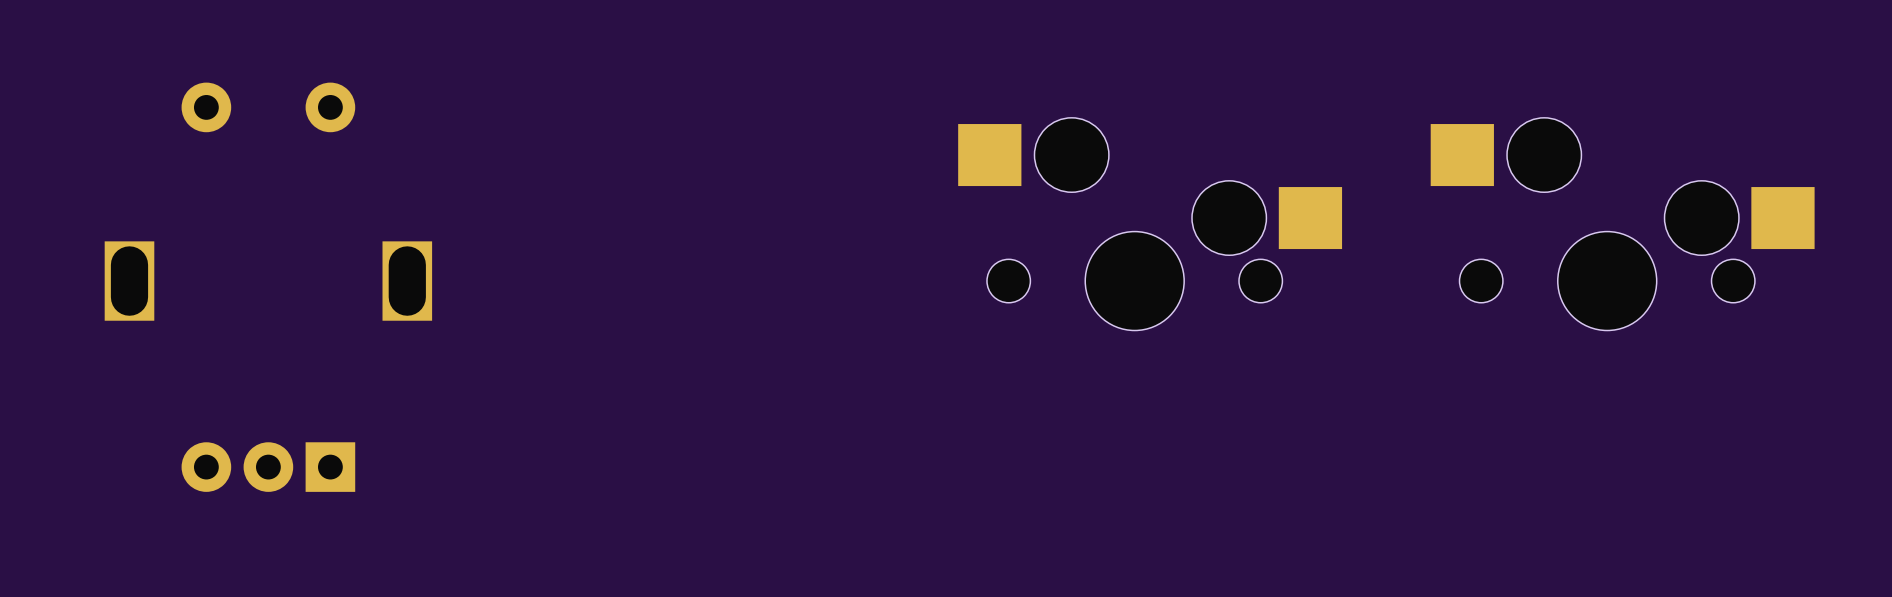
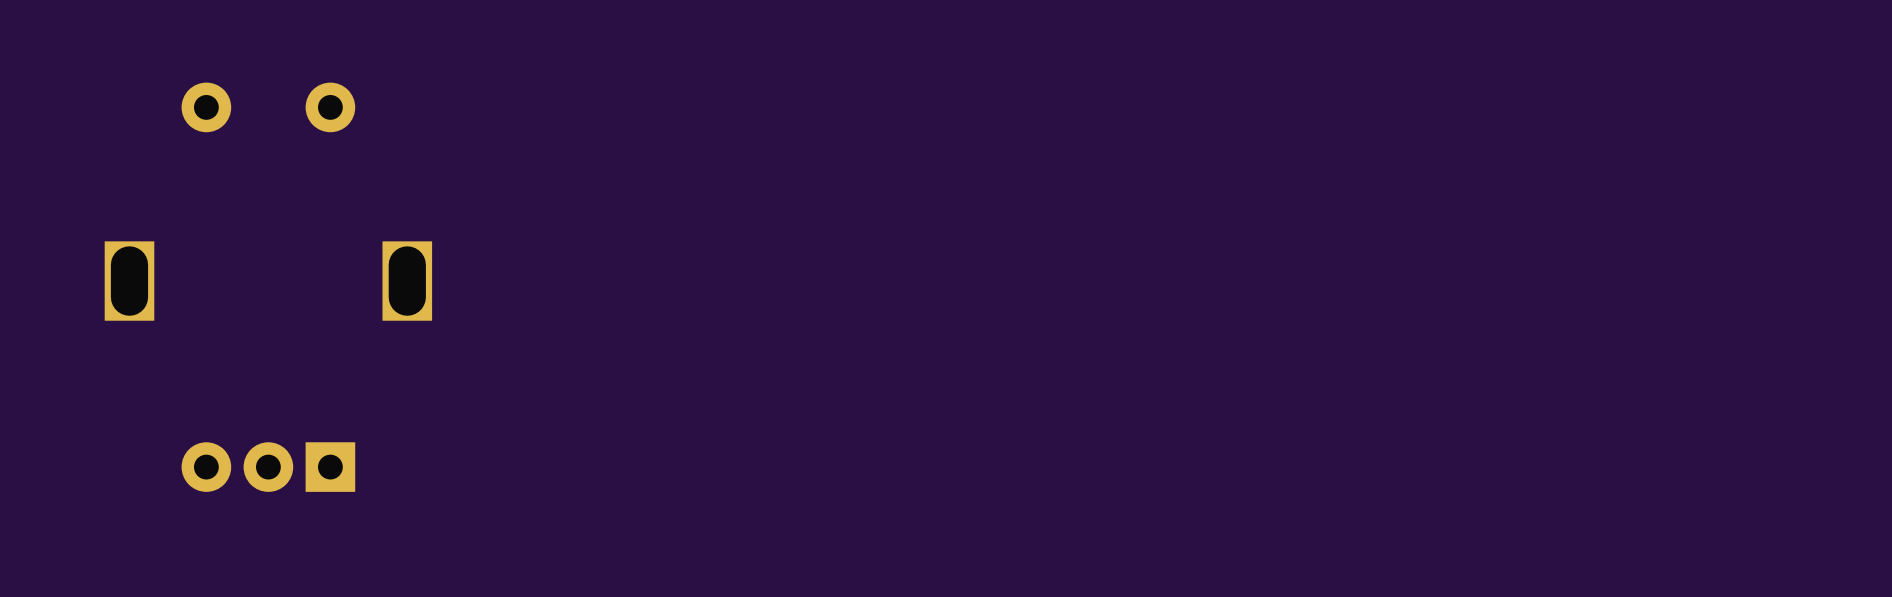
part: (1150, 224) -> none
part: (1622, 224) -> none

